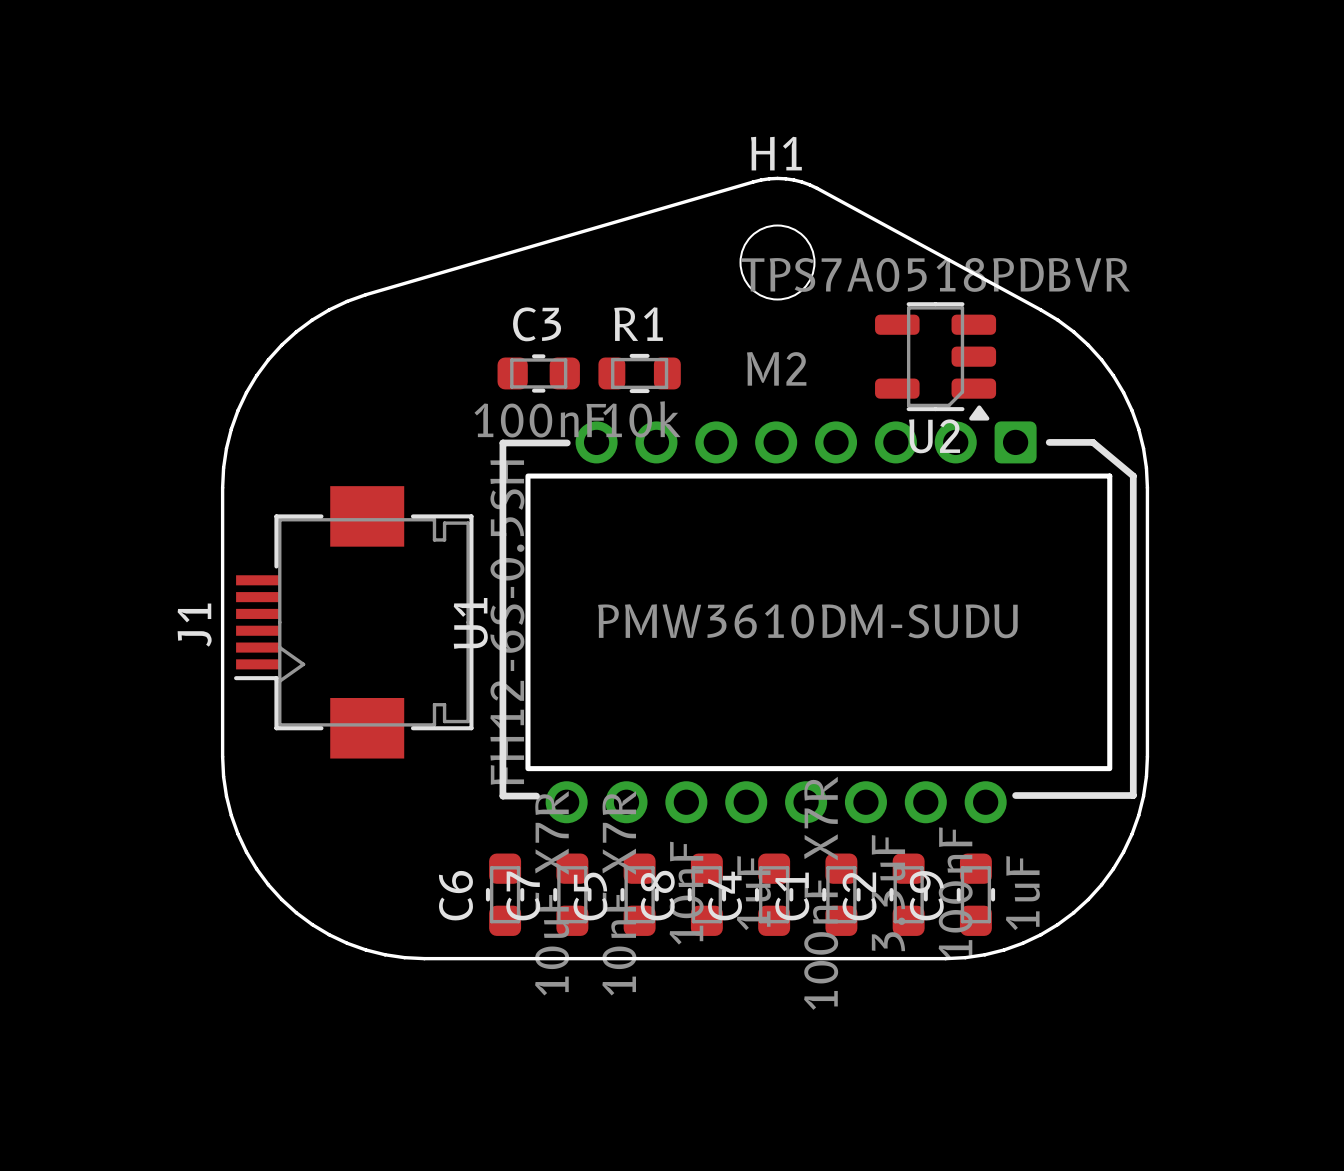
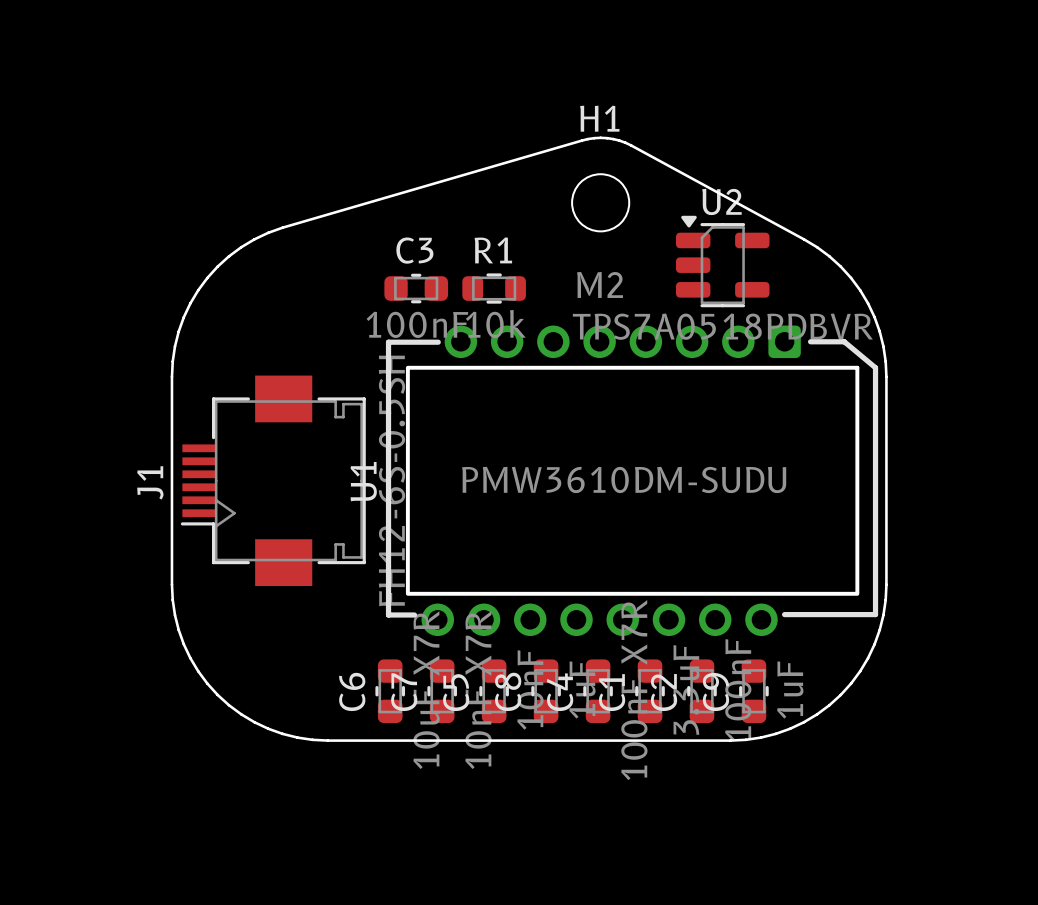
U2 rotation: 0° (935, 361) -> 180° (722, 261)

